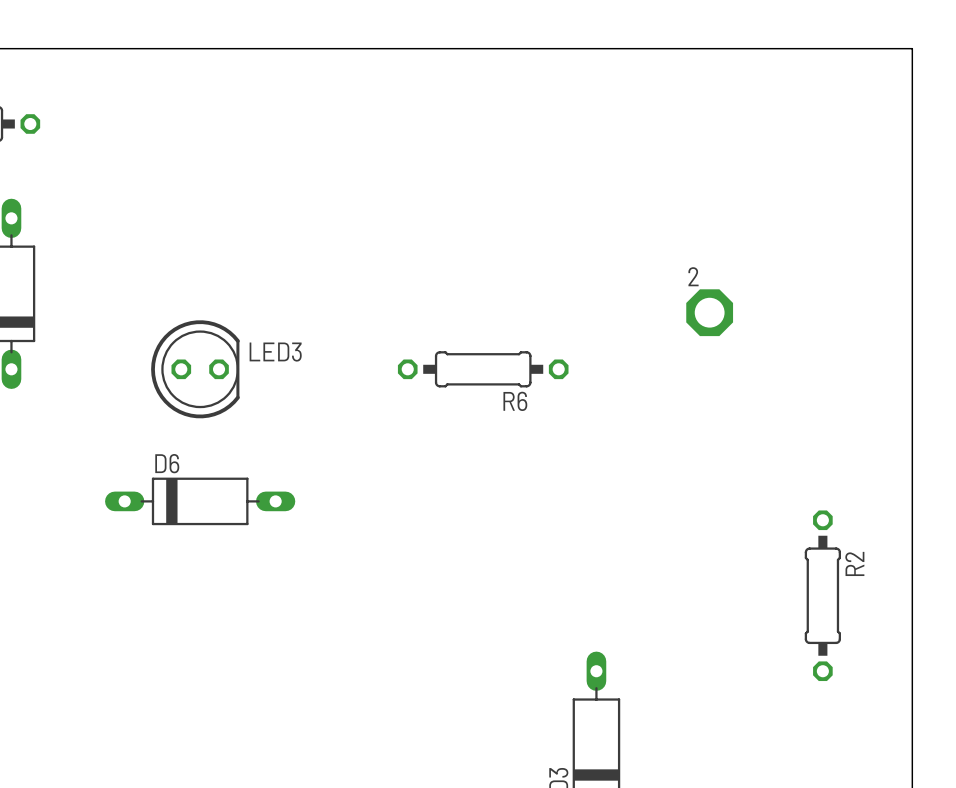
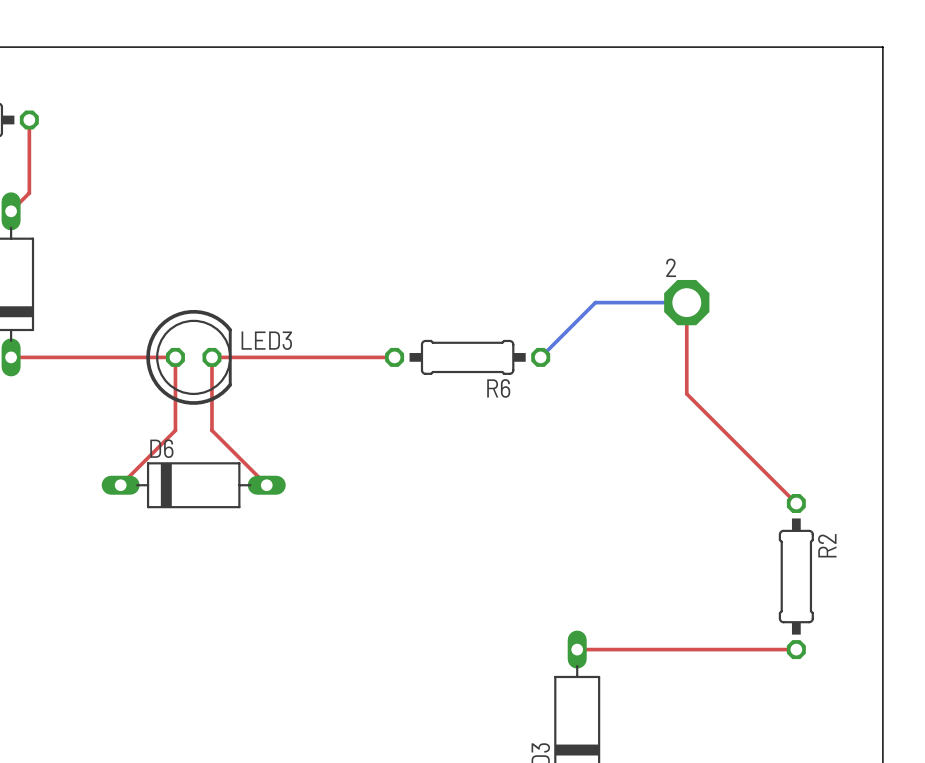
top track: none -> (29, 120) (29, 193) (11, 211)
bottom track: none -> (686, 302) (595, 302) (540, 357)
top track: none -> (686, 302) (686, 393) (796, 503)
top track: none -> (11, 357) (175, 357) (175, 430) (120, 485)
top track: none -> (394, 357) (211, 357) (211, 430) (266, 485)
top track: none -> (577, 649) (796, 649)

